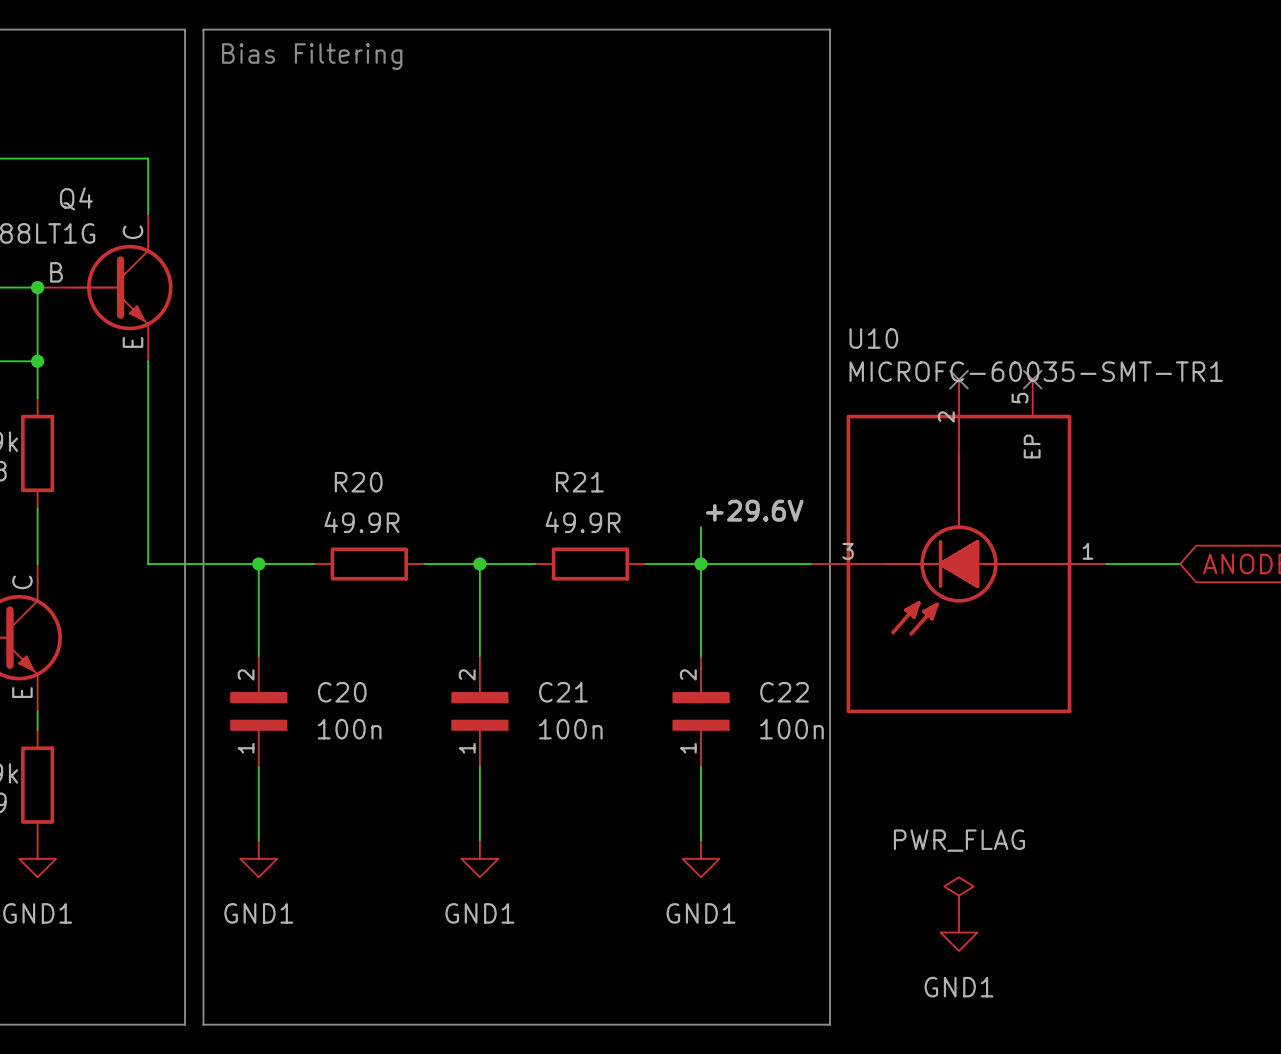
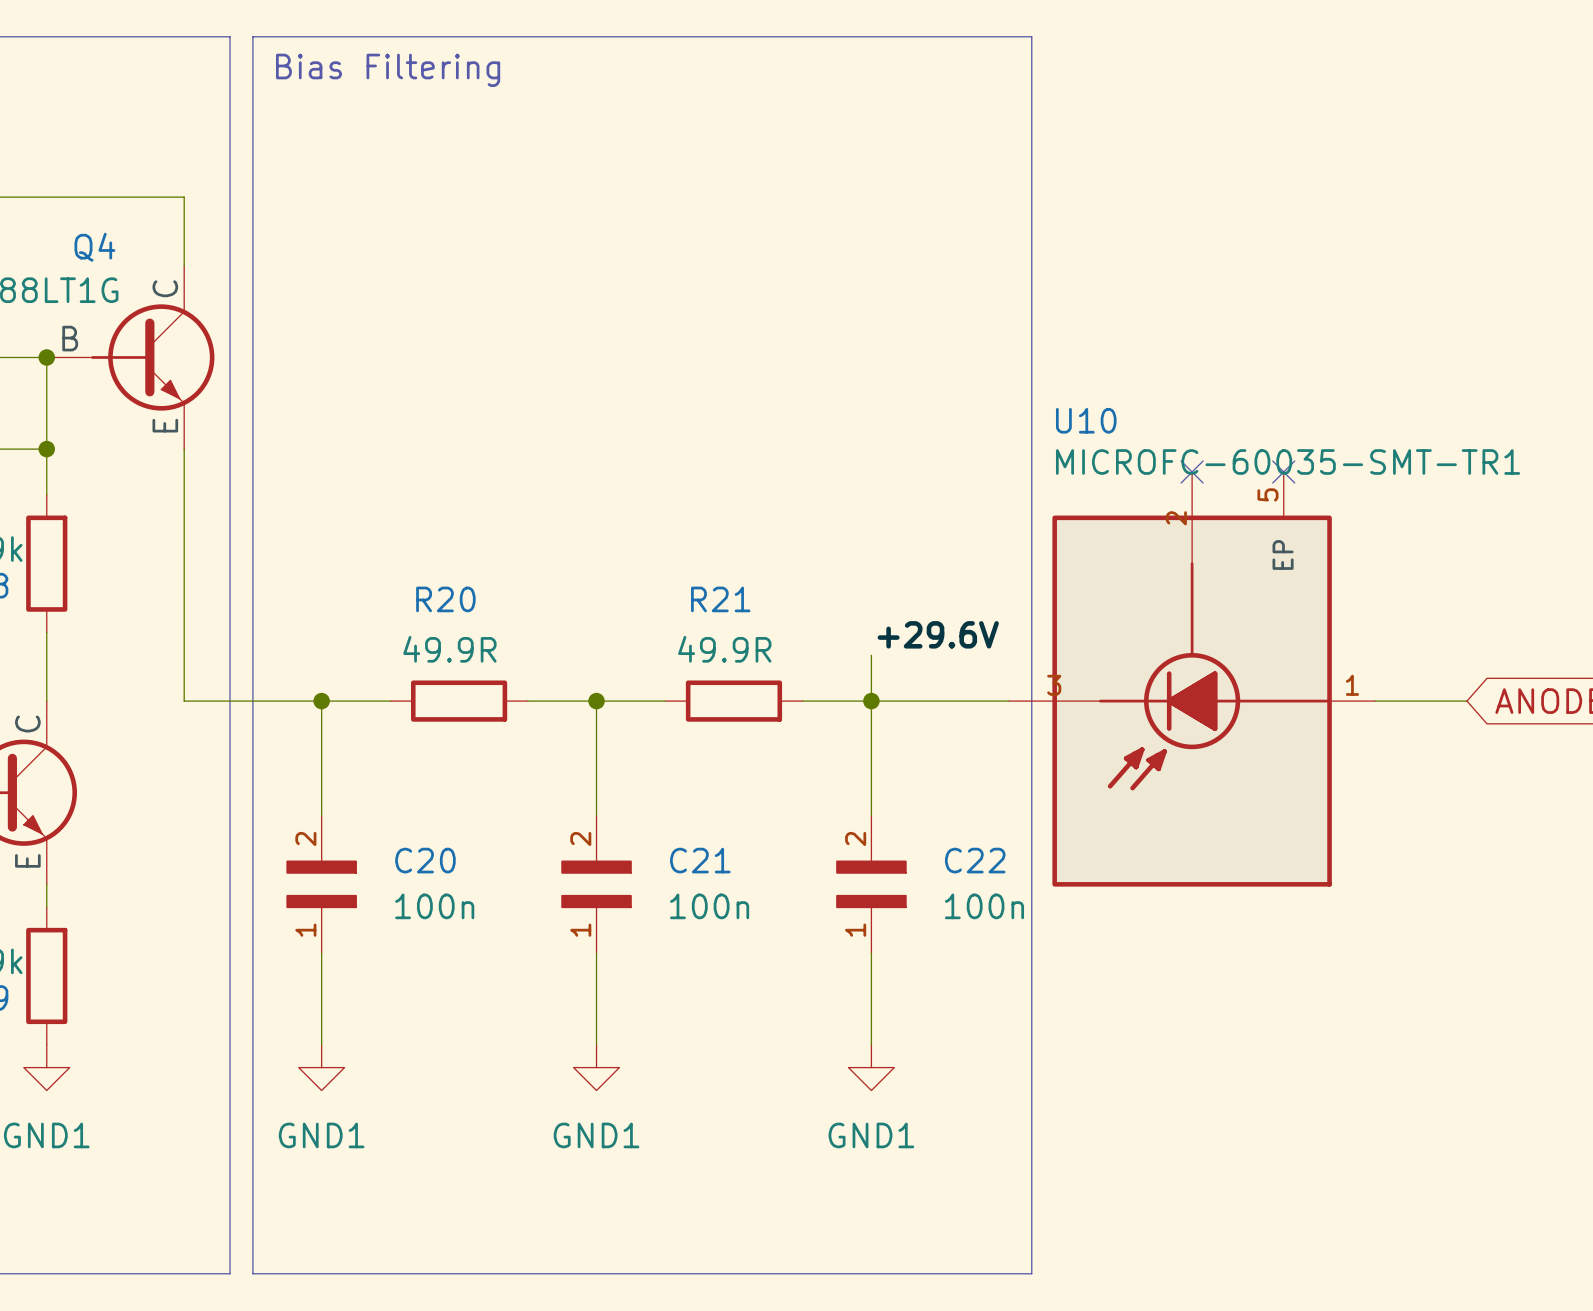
power symbol: PWR_FLAG (958, 895) -> none
power symbol: GND1 (958, 932) -> none

